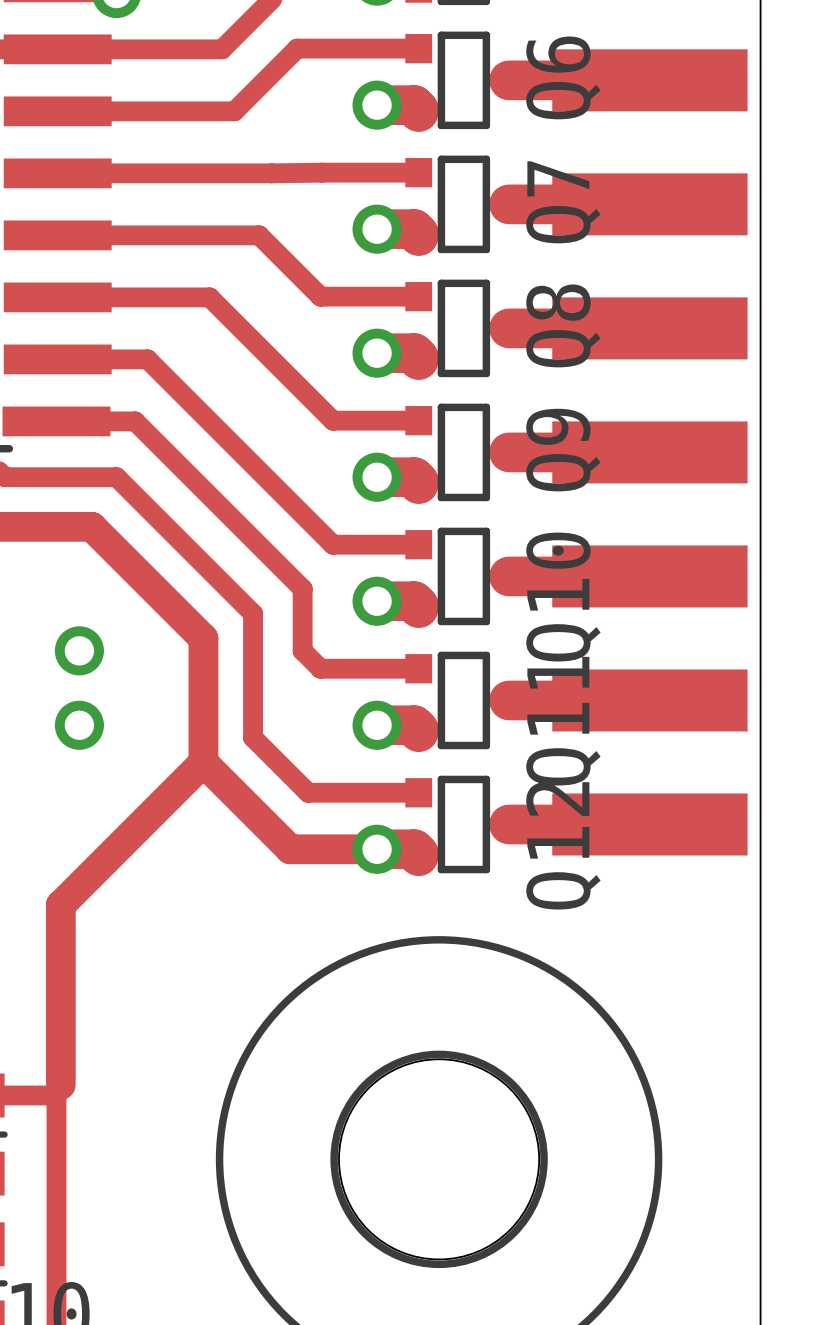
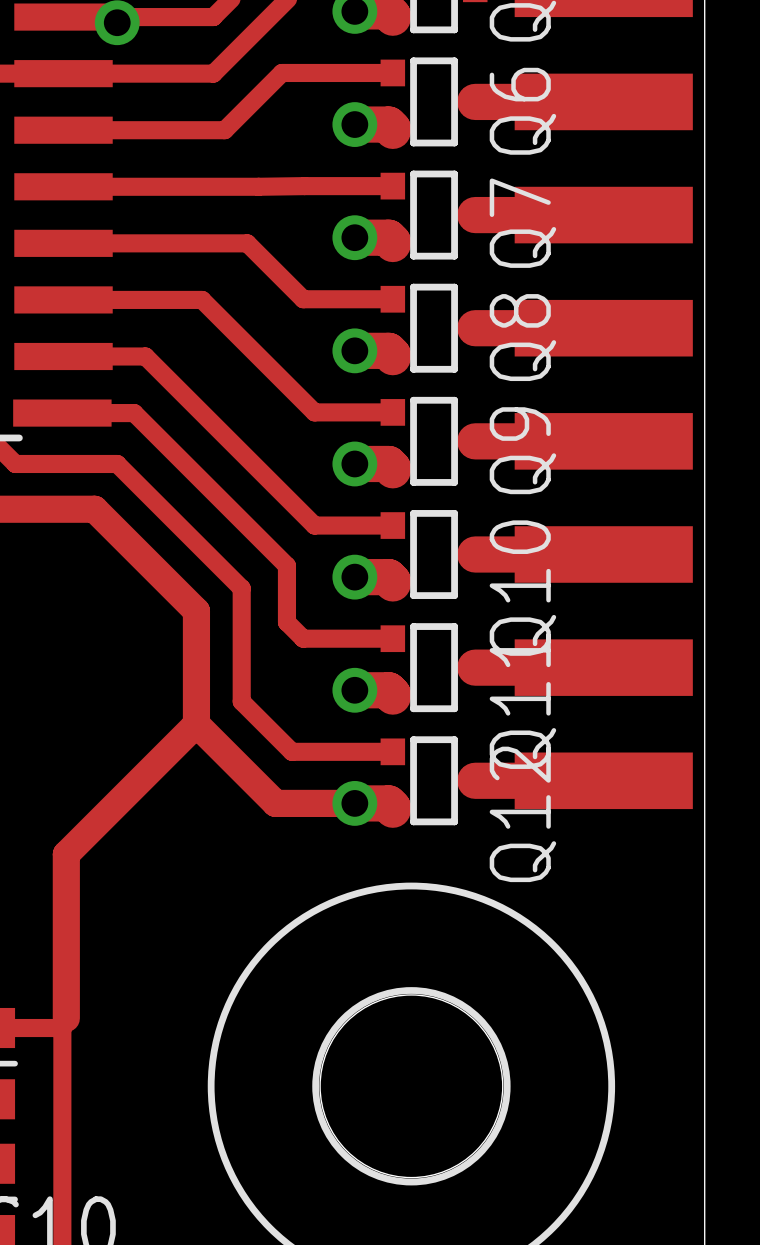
via: (79, 650) -> none
via: (79, 725) -> none

